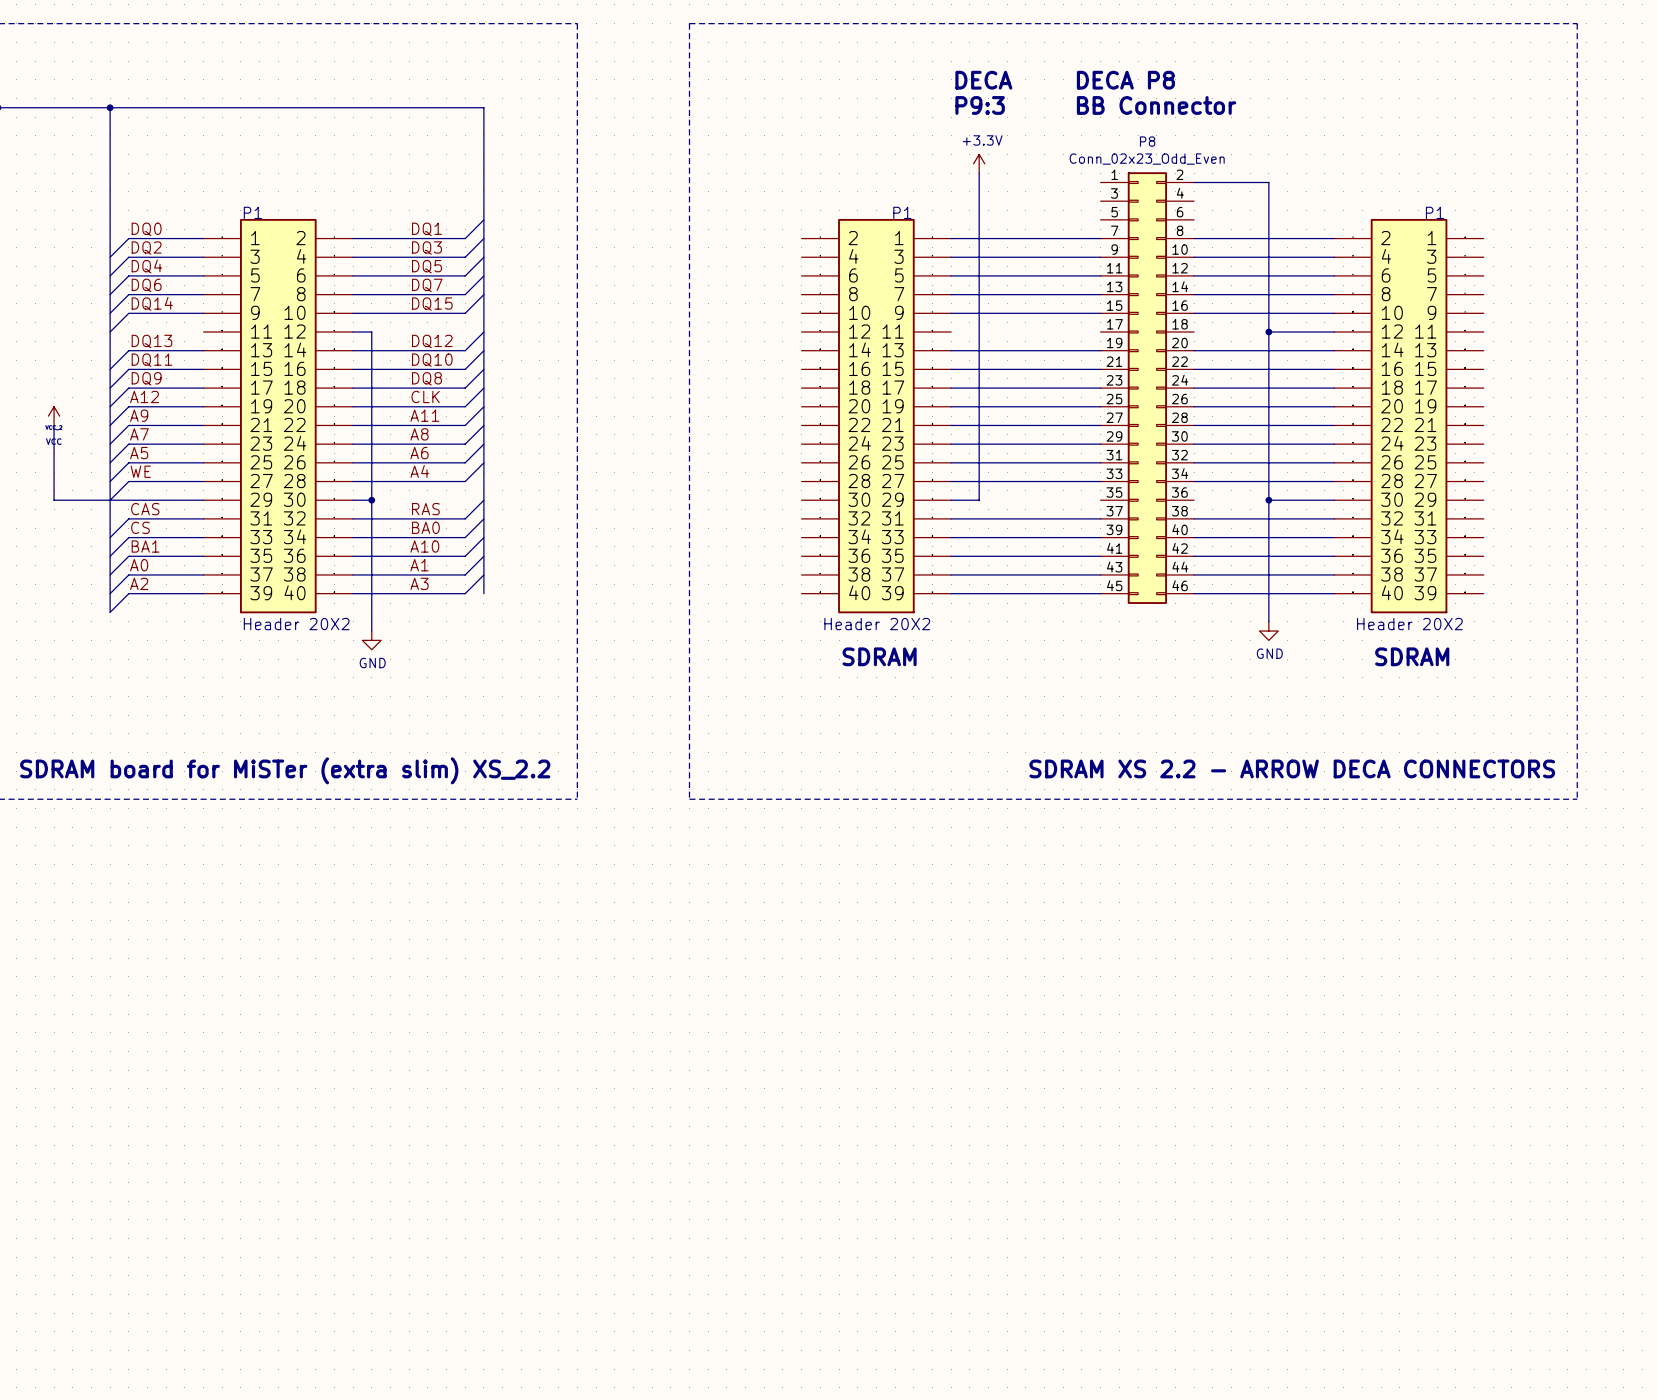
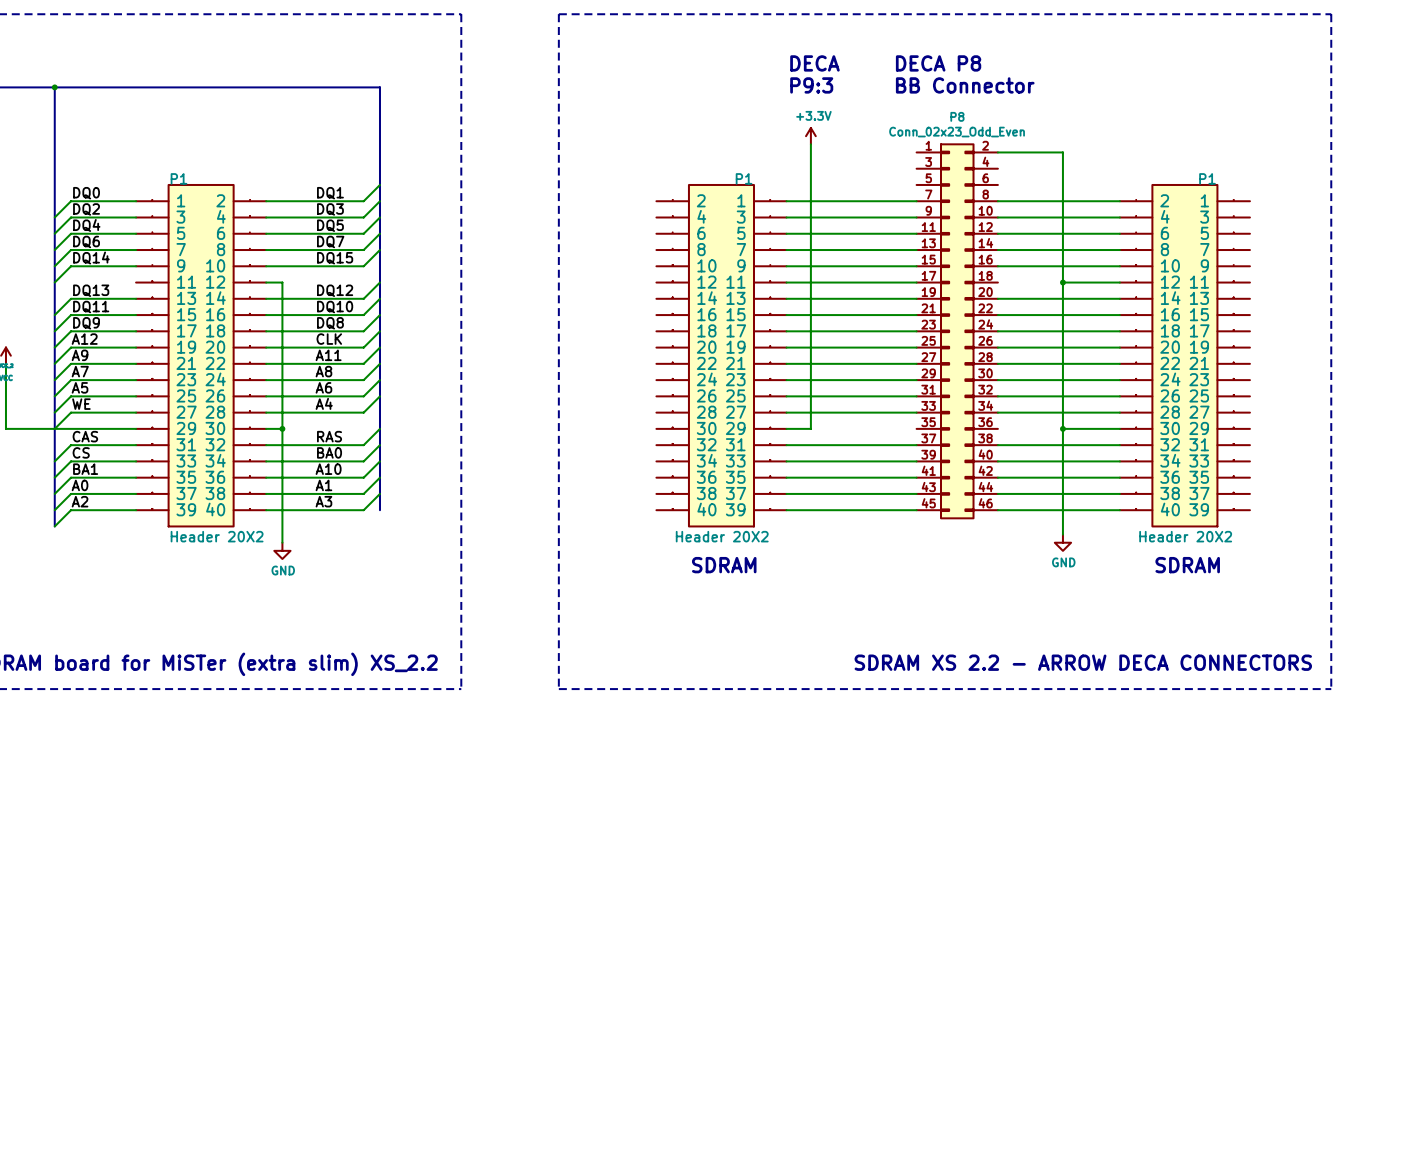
wire: none -> (786, 282) (916, 282)

